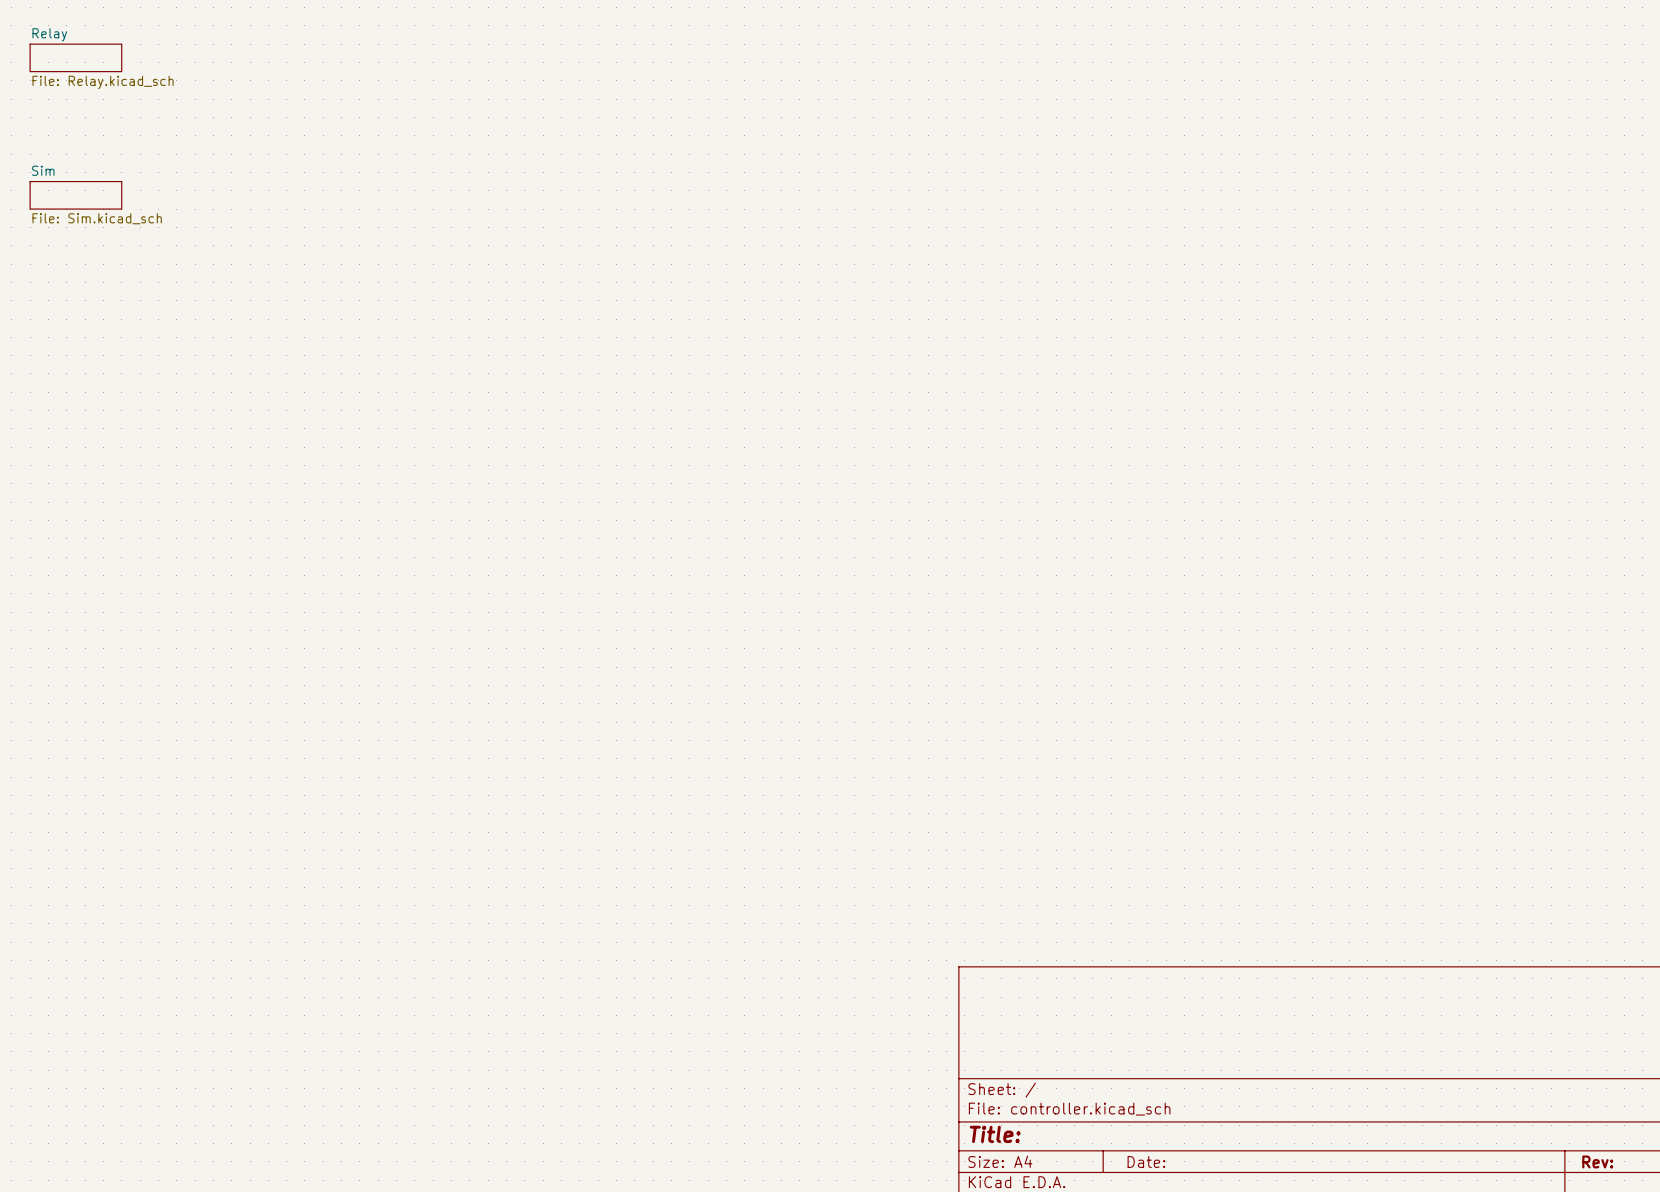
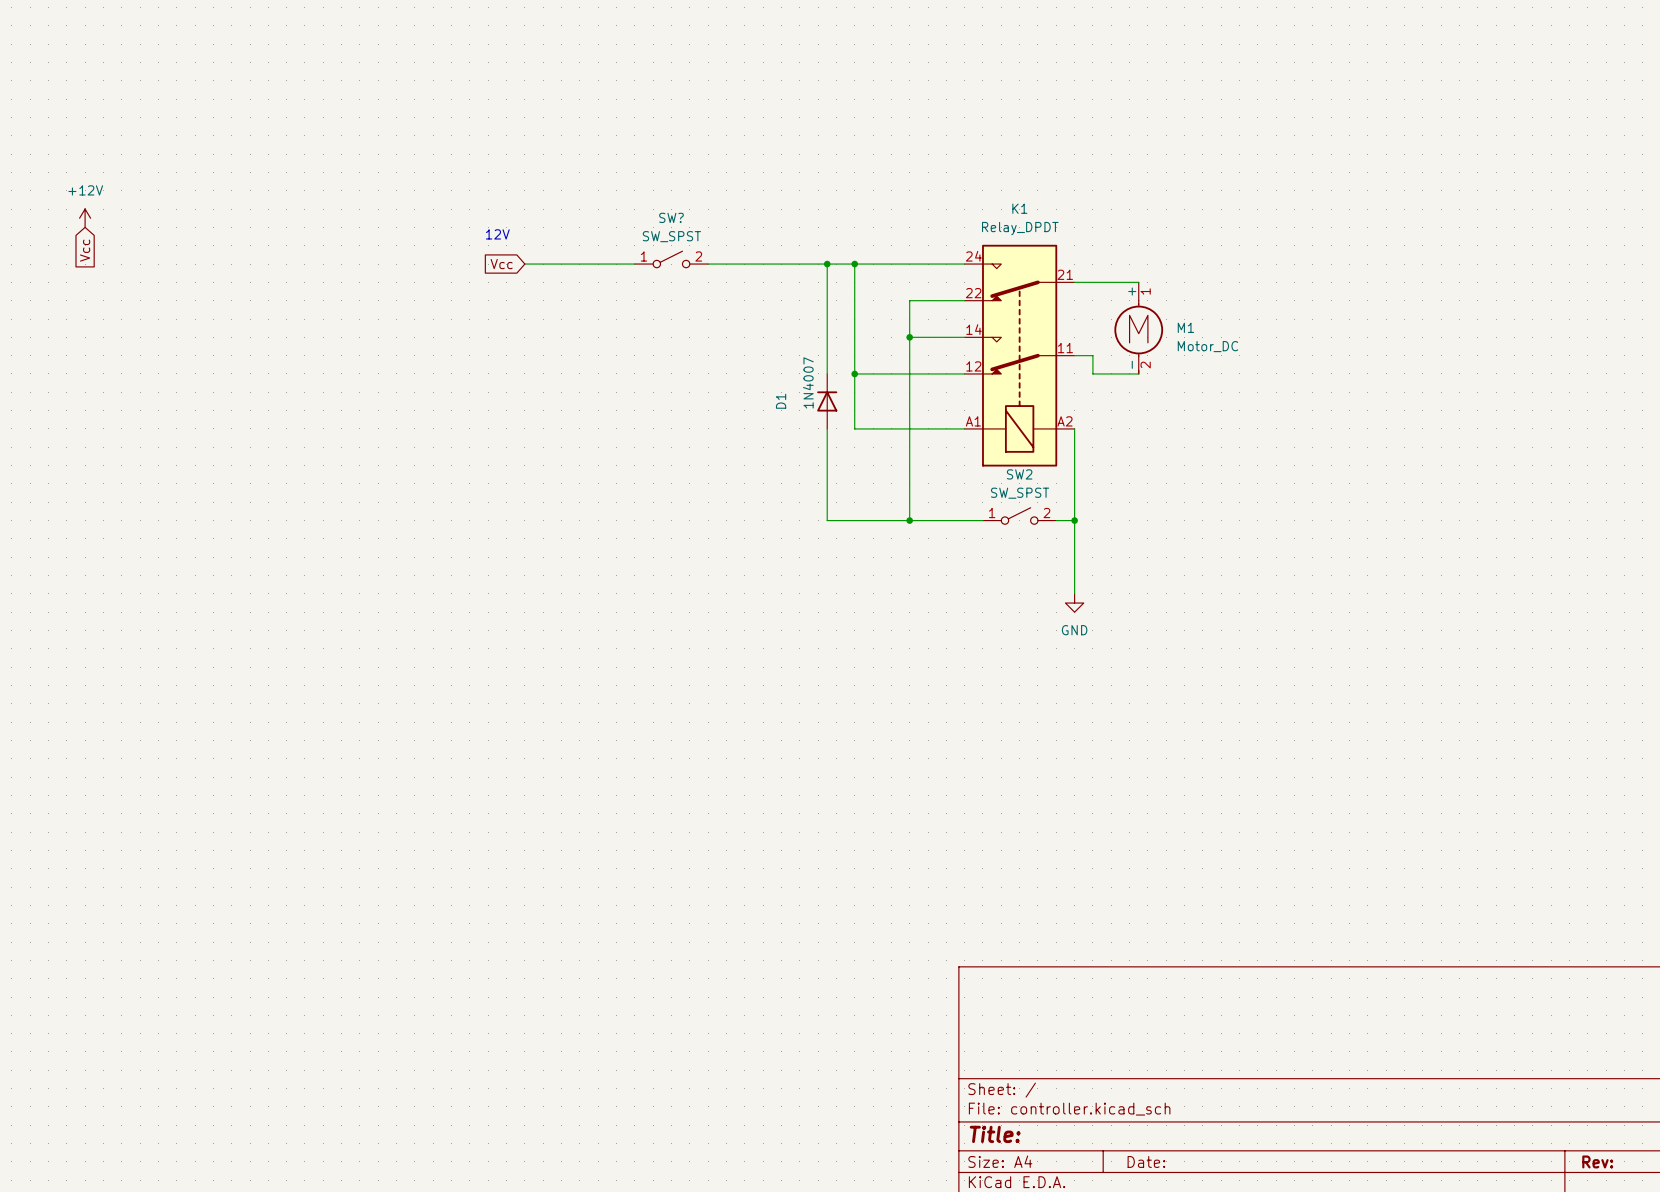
sheet Relay: File: Relay.kicad_sch (75, 57) -> none
sheet Sim: File: Sim.kicad_sch (75, 195) -> none
power symbol: none -> +12V (85, 218)
text: none -> 12V (497, 234)
global label: none -> Vcc (85, 250)
SW?: none -> SW_SPST (671, 259)
global label: none -> Vcc (501, 264)
wire: none -> (524, 264) (634, 264)
wire: none -> (708, 264) (964, 264)
wire: none -> (827, 264) (827, 373)
junction: none -> (827, 264)
wire: none -> (854, 264) (854, 428) (964, 428)
junction: none -> (854, 264)
wire: none -> (1074, 282) (1138, 282)
wire: none -> (964, 300) (909, 300) (909, 520)
M1: none -> Motor_DC (1138, 328)
wire: none -> (909, 337) (964, 337)
junction: none -> (909, 337)
K1: none -> Relay_DPDT (1019, 355)
wire: none -> (1074, 355) (1092, 355) (1092, 373) (1138, 373)
wire: none -> (854, 373) (964, 373)
junction: none -> (854, 373)
D1: none -> 1N4007 (827, 401)
wire: none -> (827, 428) (827, 520) (982, 520)
wire: none -> (1074, 428) (1074, 593)
SW2: none -> SW_SPST (1019, 515)
junction: none -> (909, 520)
wire: none -> (1056, 520) (1074, 520)
junction: none -> (1074, 520)
power symbol: none -> GND (1074, 603)

